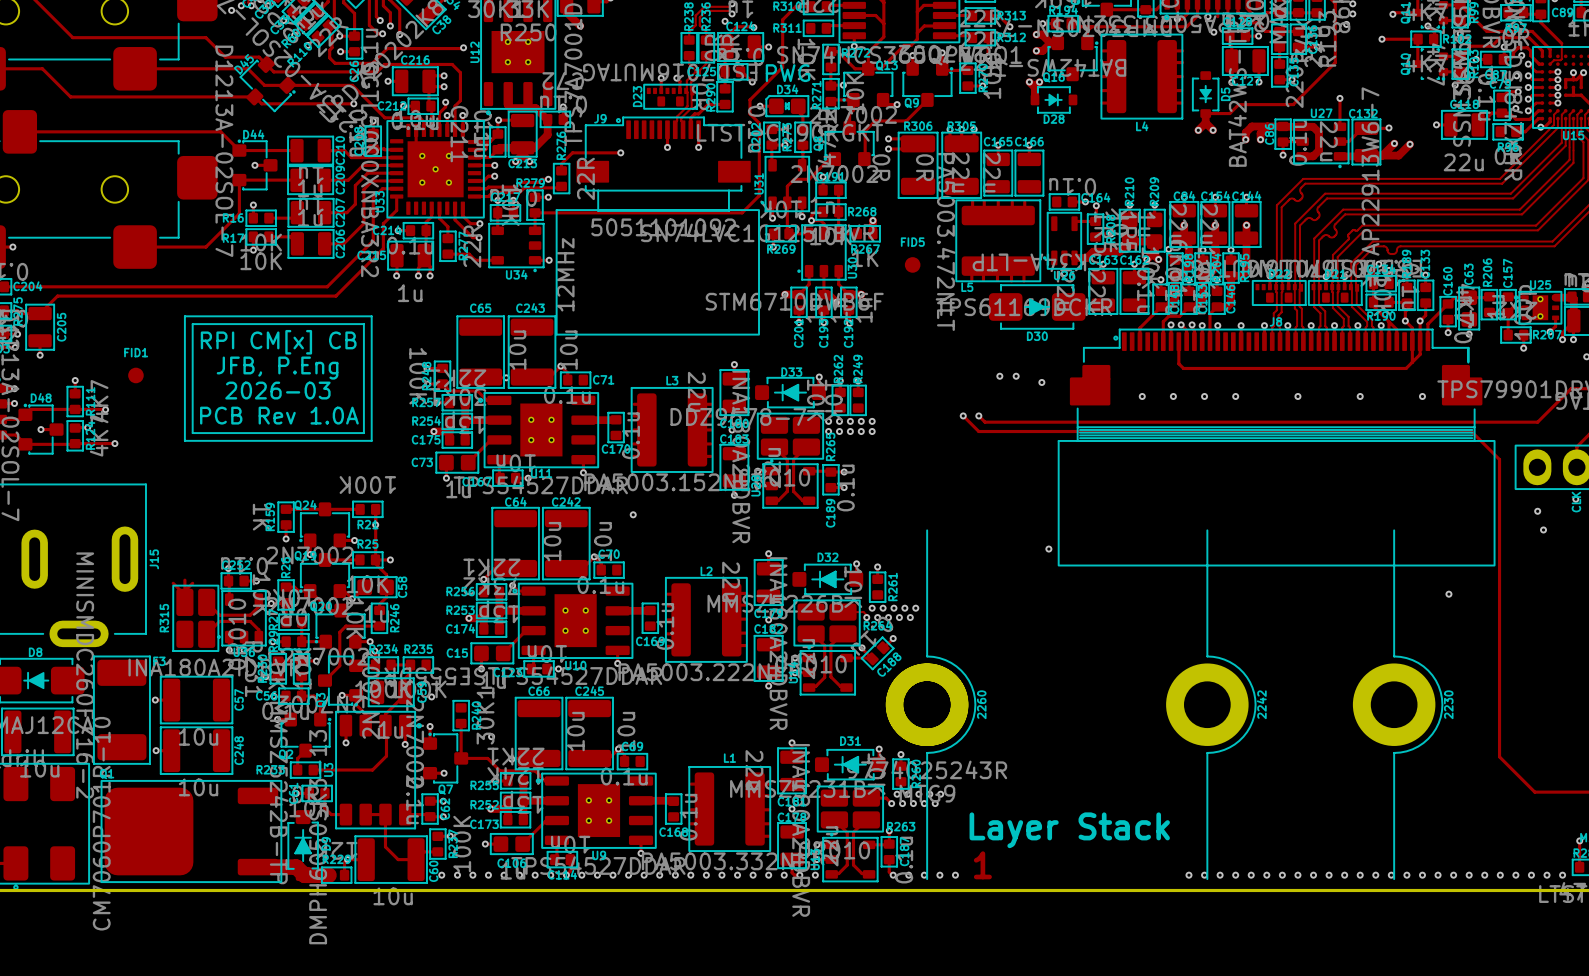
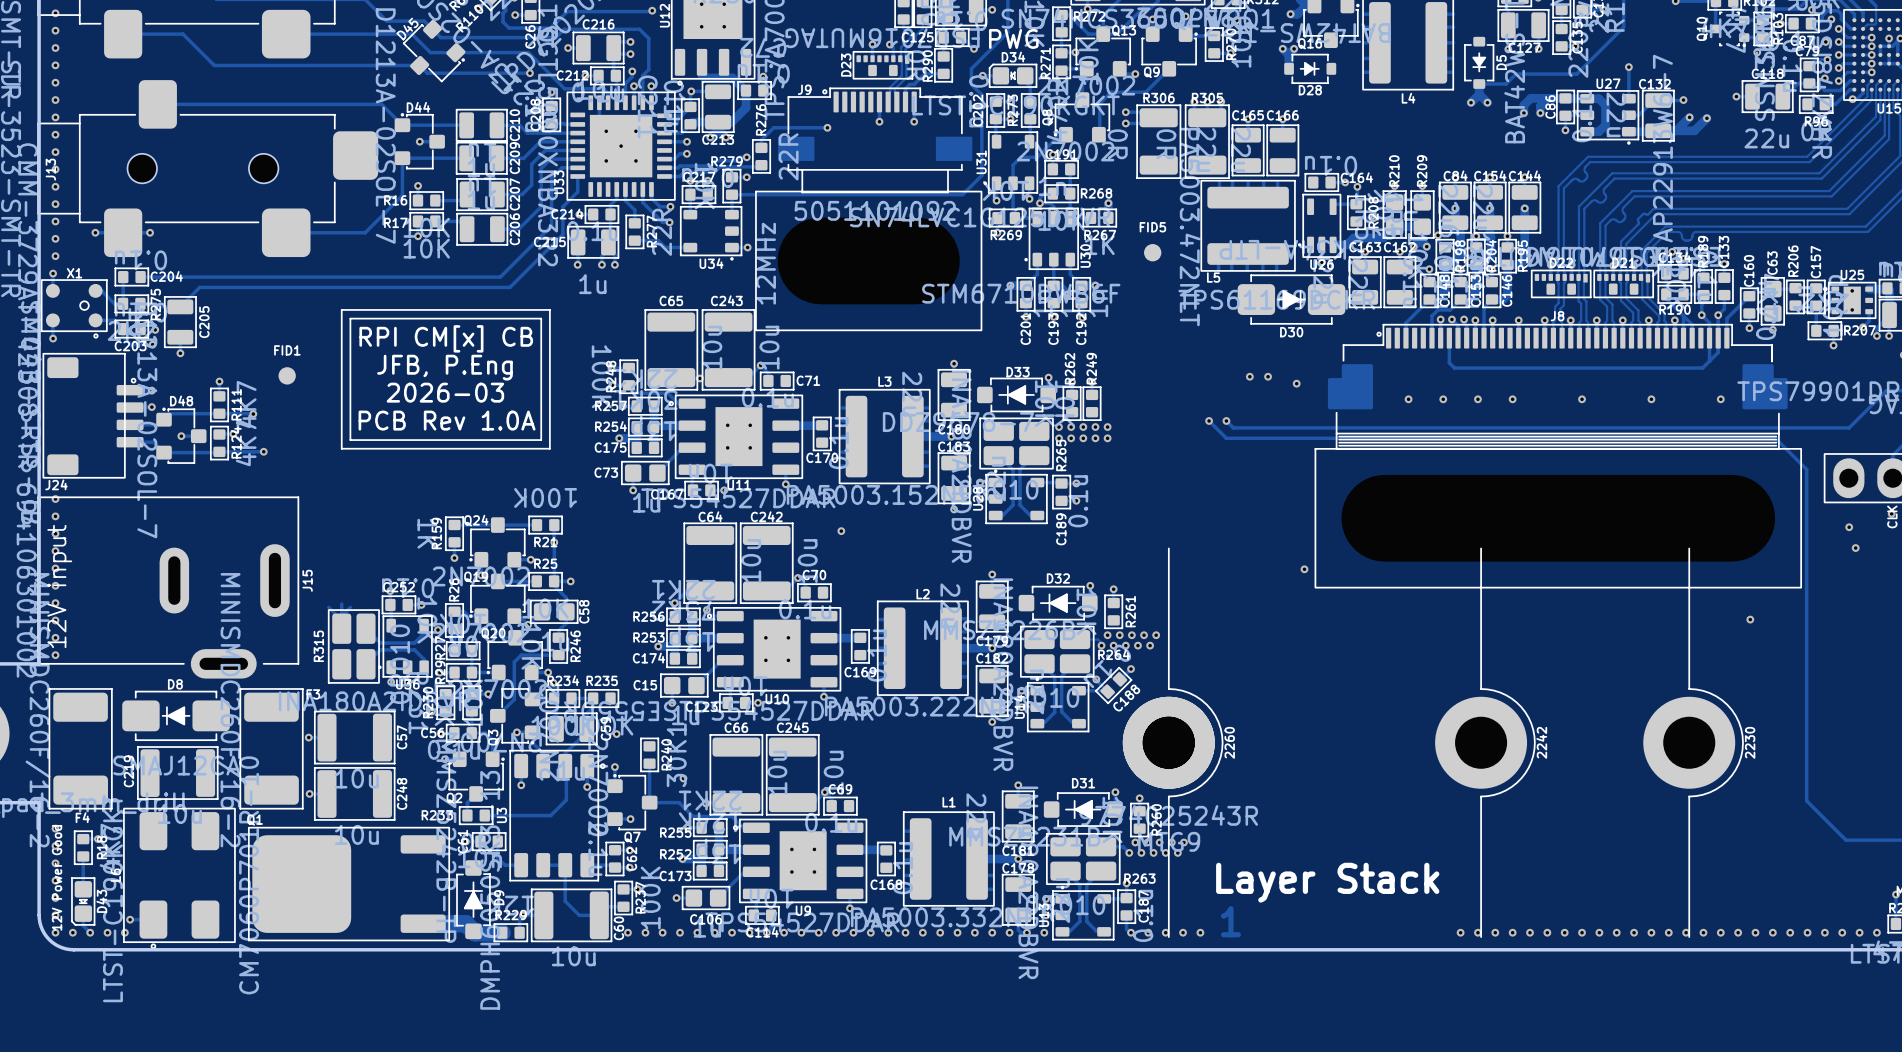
track: none -> (912, 436) (951, 436)
track: none -> (951, 648) (992, 648)
track: none -> (977, 858) (1018, 858)

